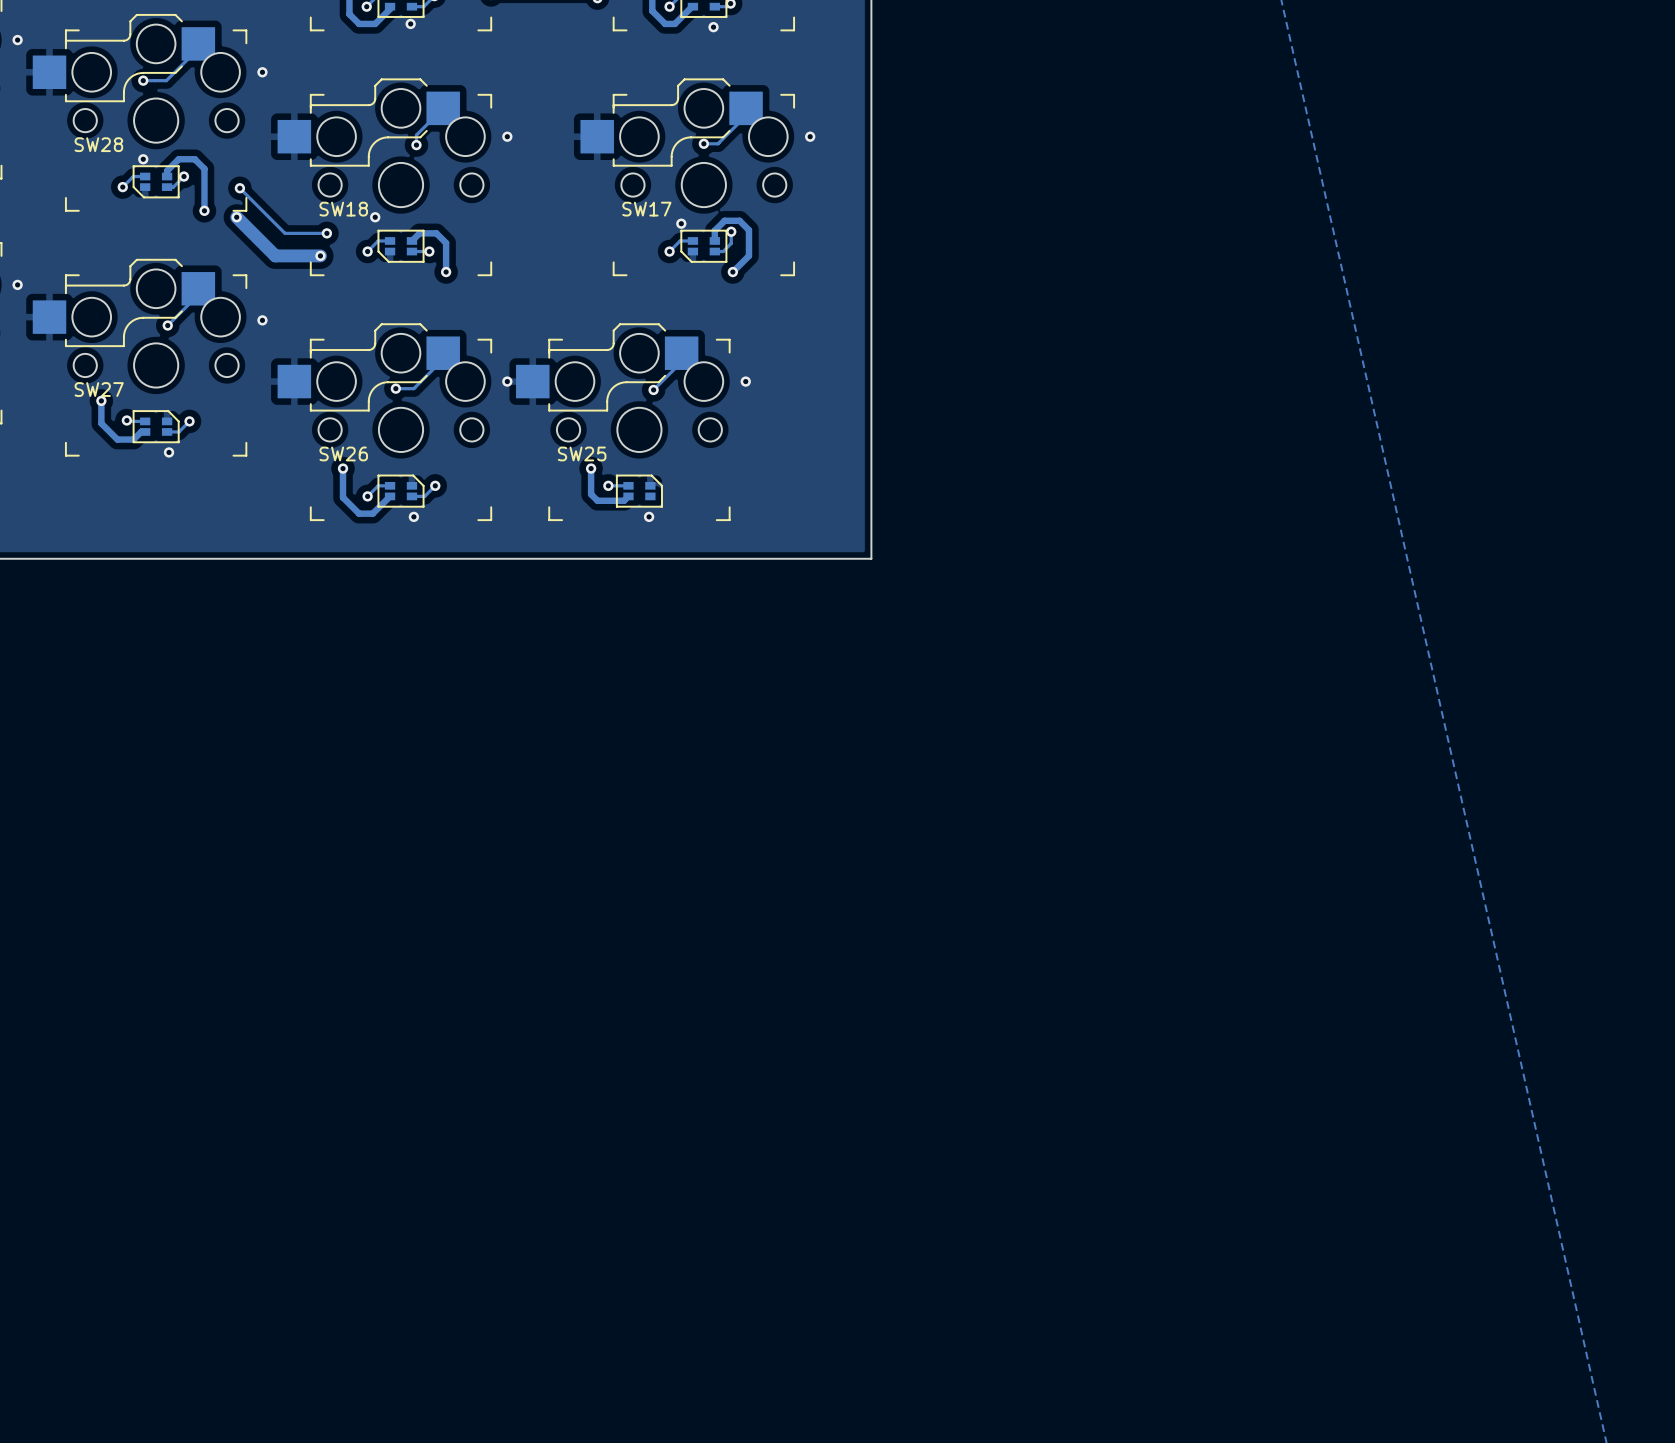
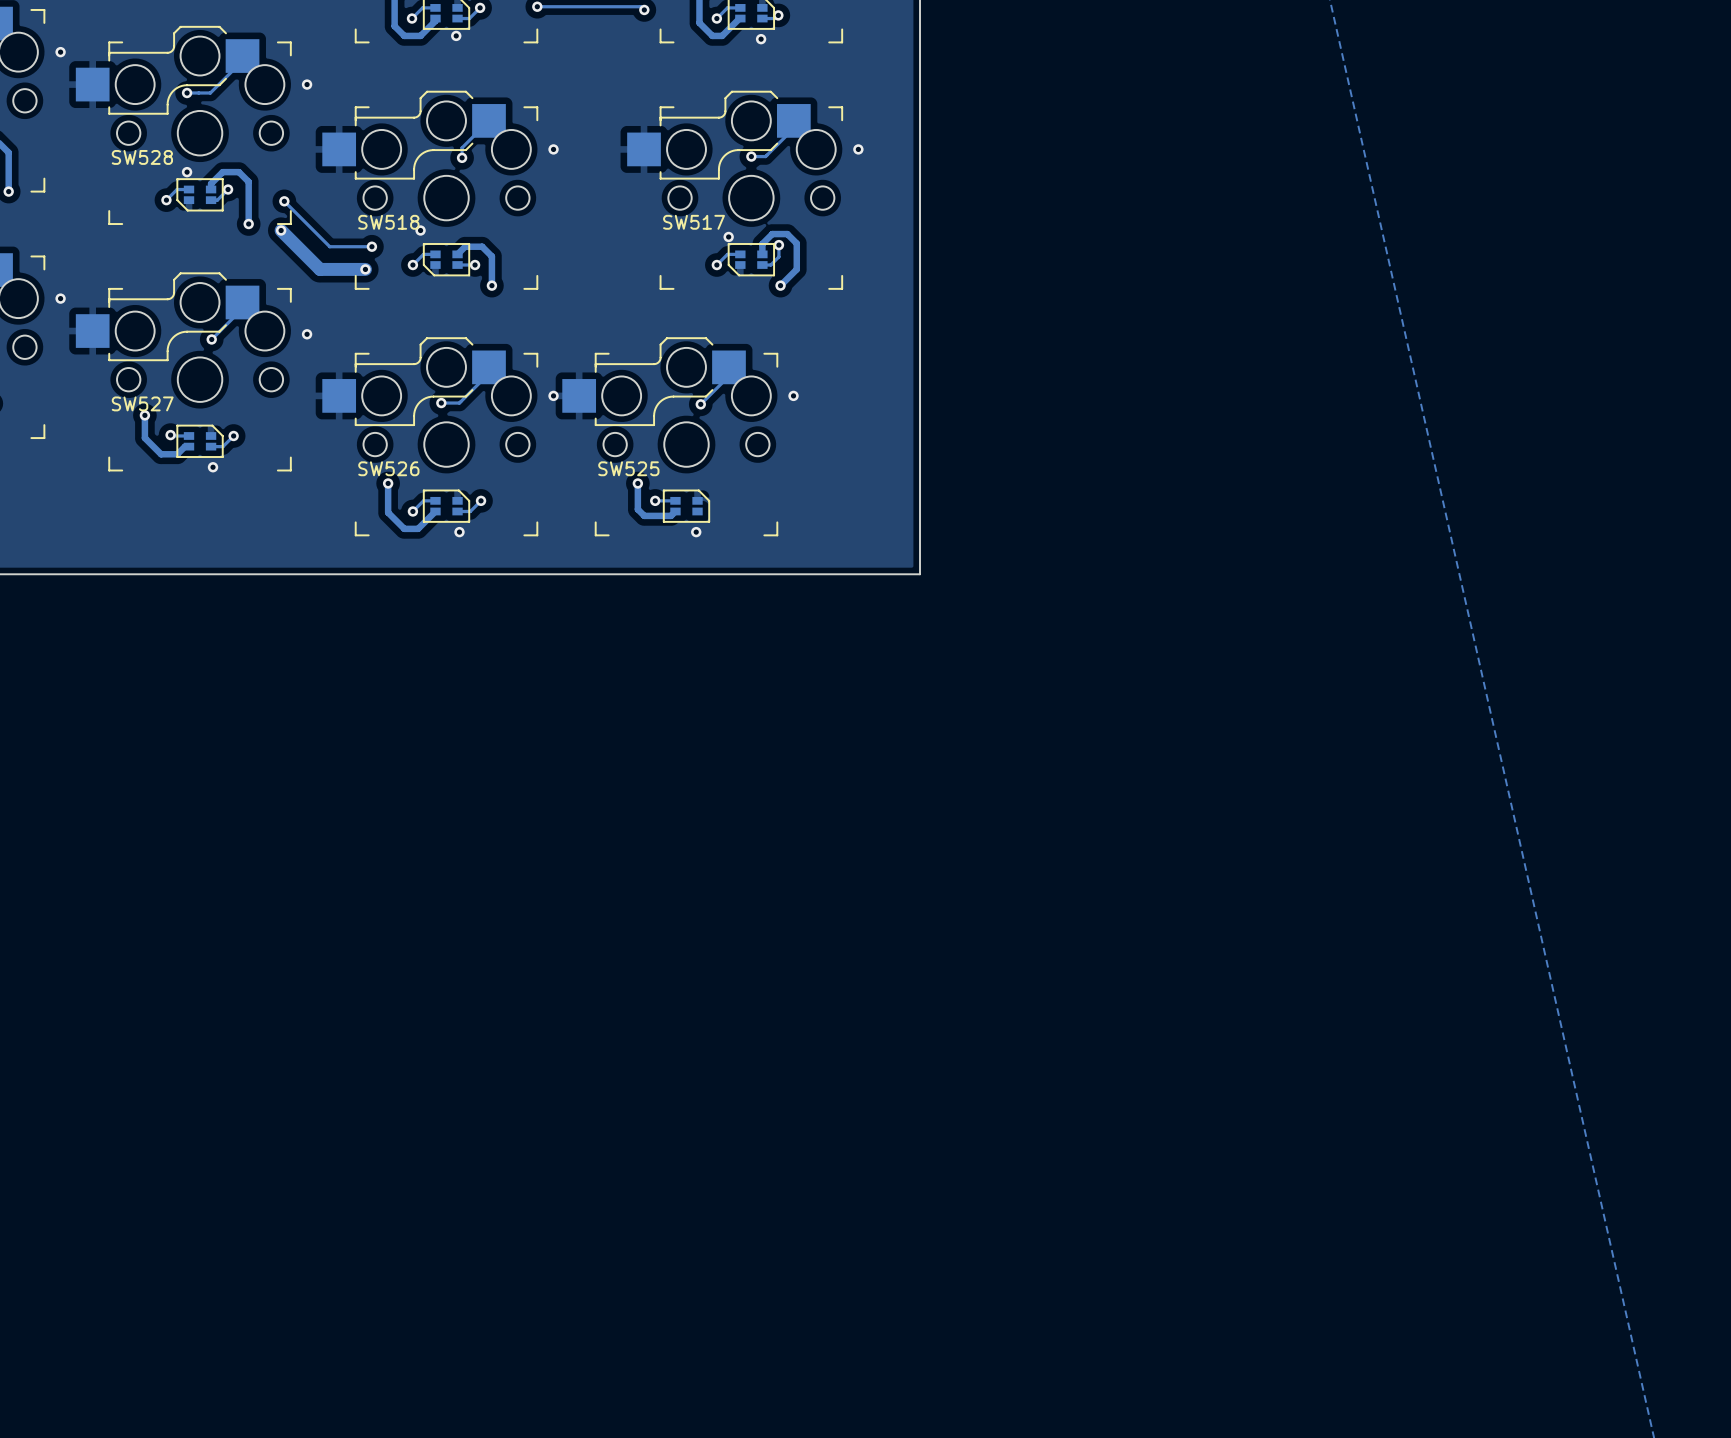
SW28 name: SW28 (98, 144) -> SW528 (142, 157)
SW18 name: SW18 (343, 209) -> SW518 (388, 222)
SW17 name: SW17 (646, 209) -> SW517 (694, 222)
SW27 name: SW27 (99, 389) -> SW527 (142, 403)
SW26 name: SW26 (343, 453) -> SW526 (388, 468)
SW25 name: SW25 (582, 453) -> SW525 (628, 468)

